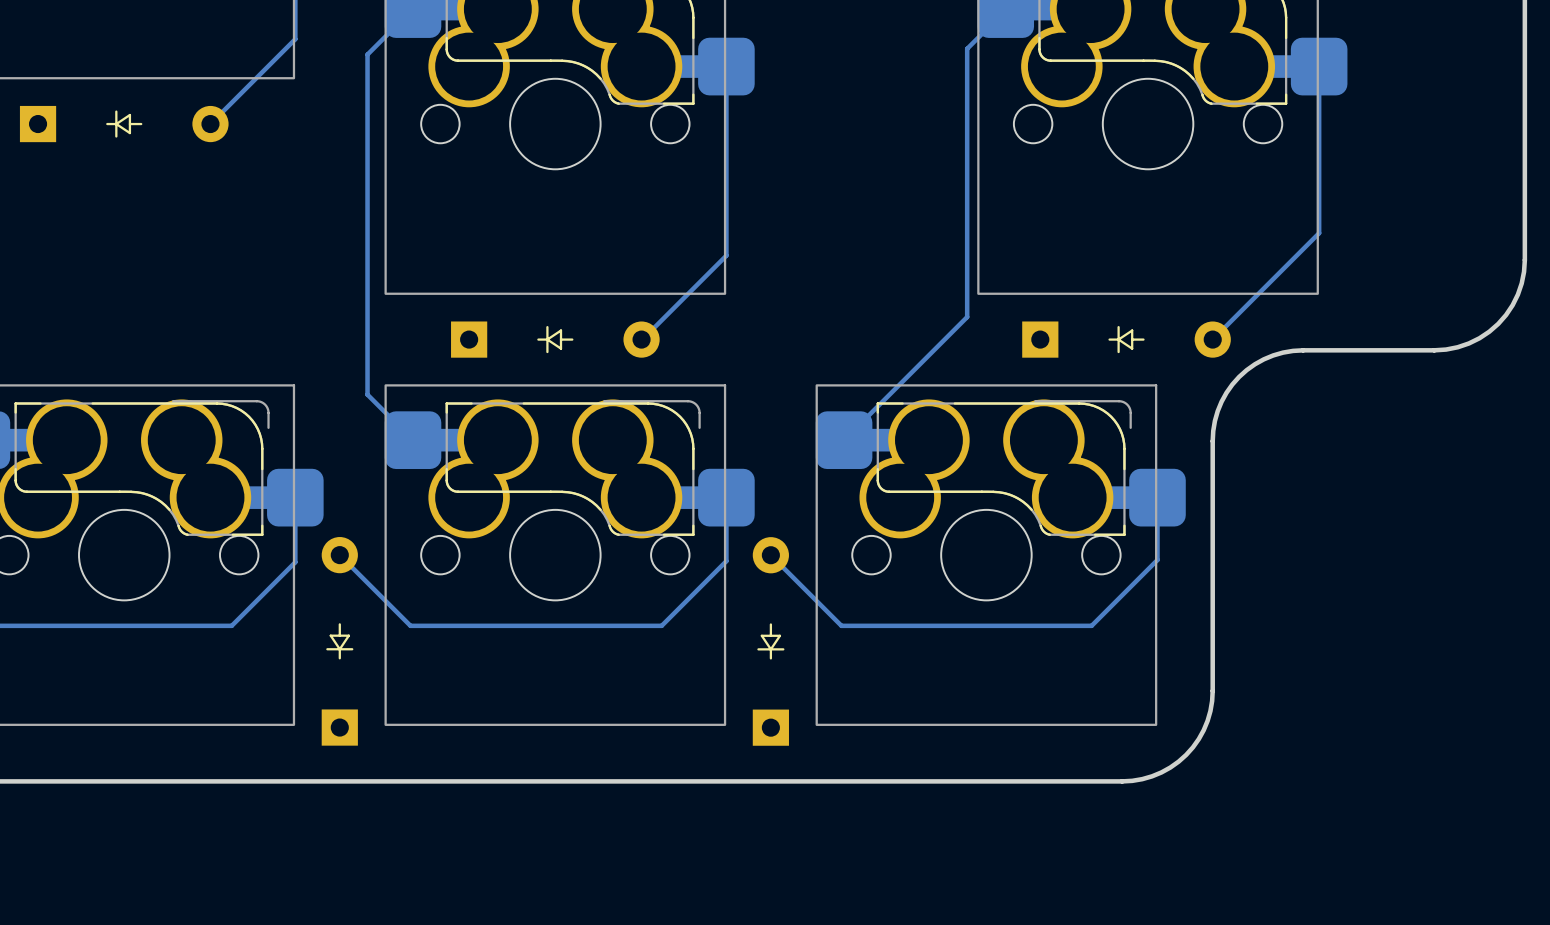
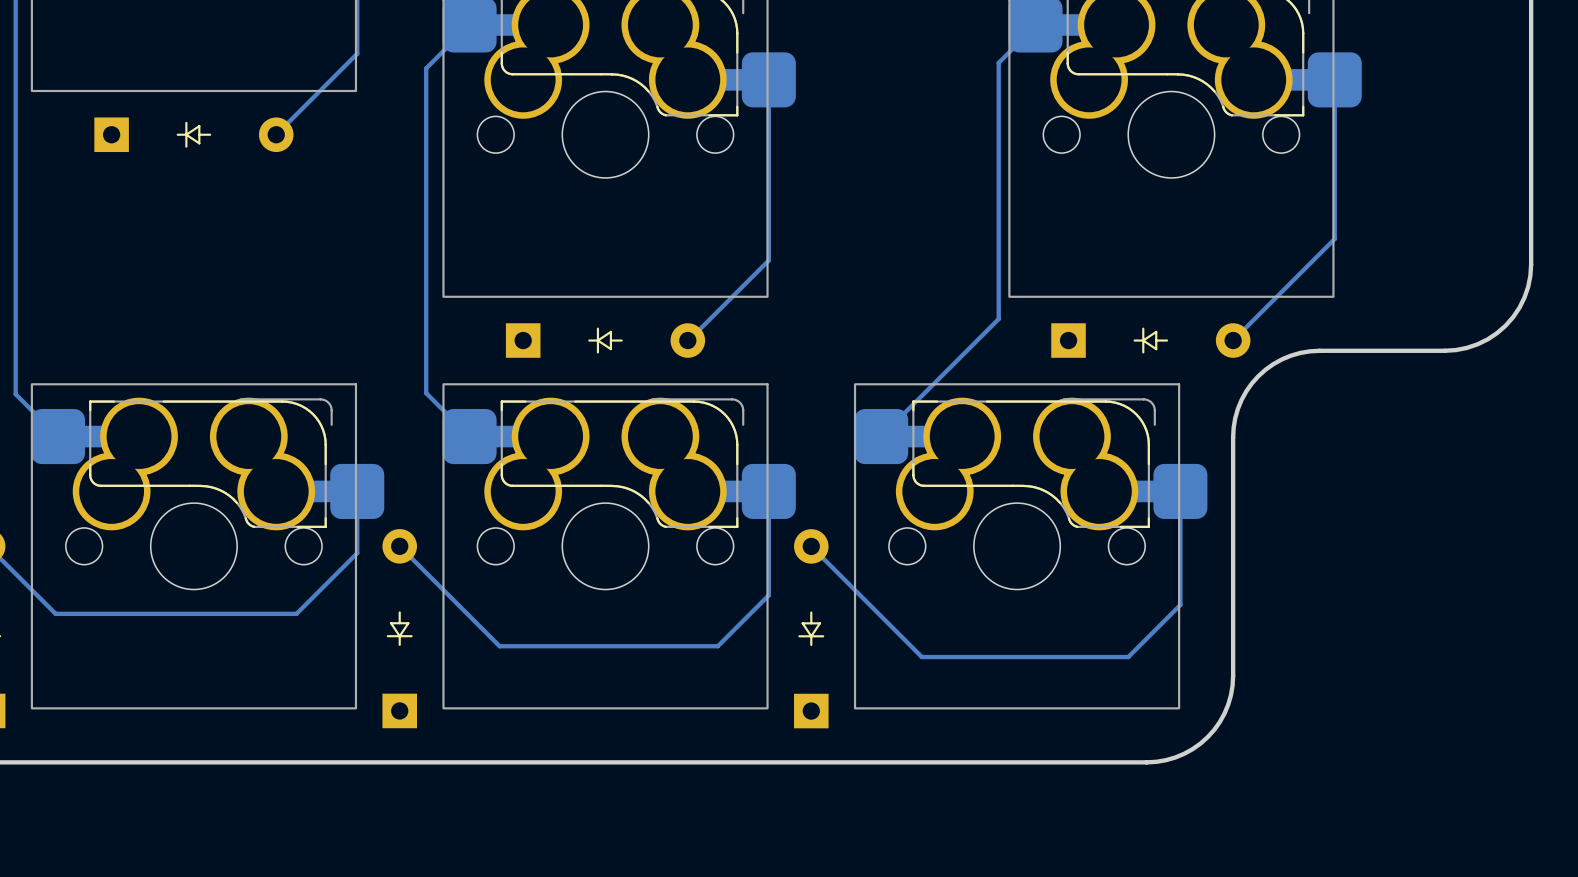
track: (1157, 559) (1091, 625) (841, 625) -> (1180, 550) (1180, 604) (1128, 657) (921, 657) (878, 613)
track: (726, 561) (661, 625) (410, 625) -> (768, 552) (768, 595) (717, 646) (499, 646) (467, 613)

